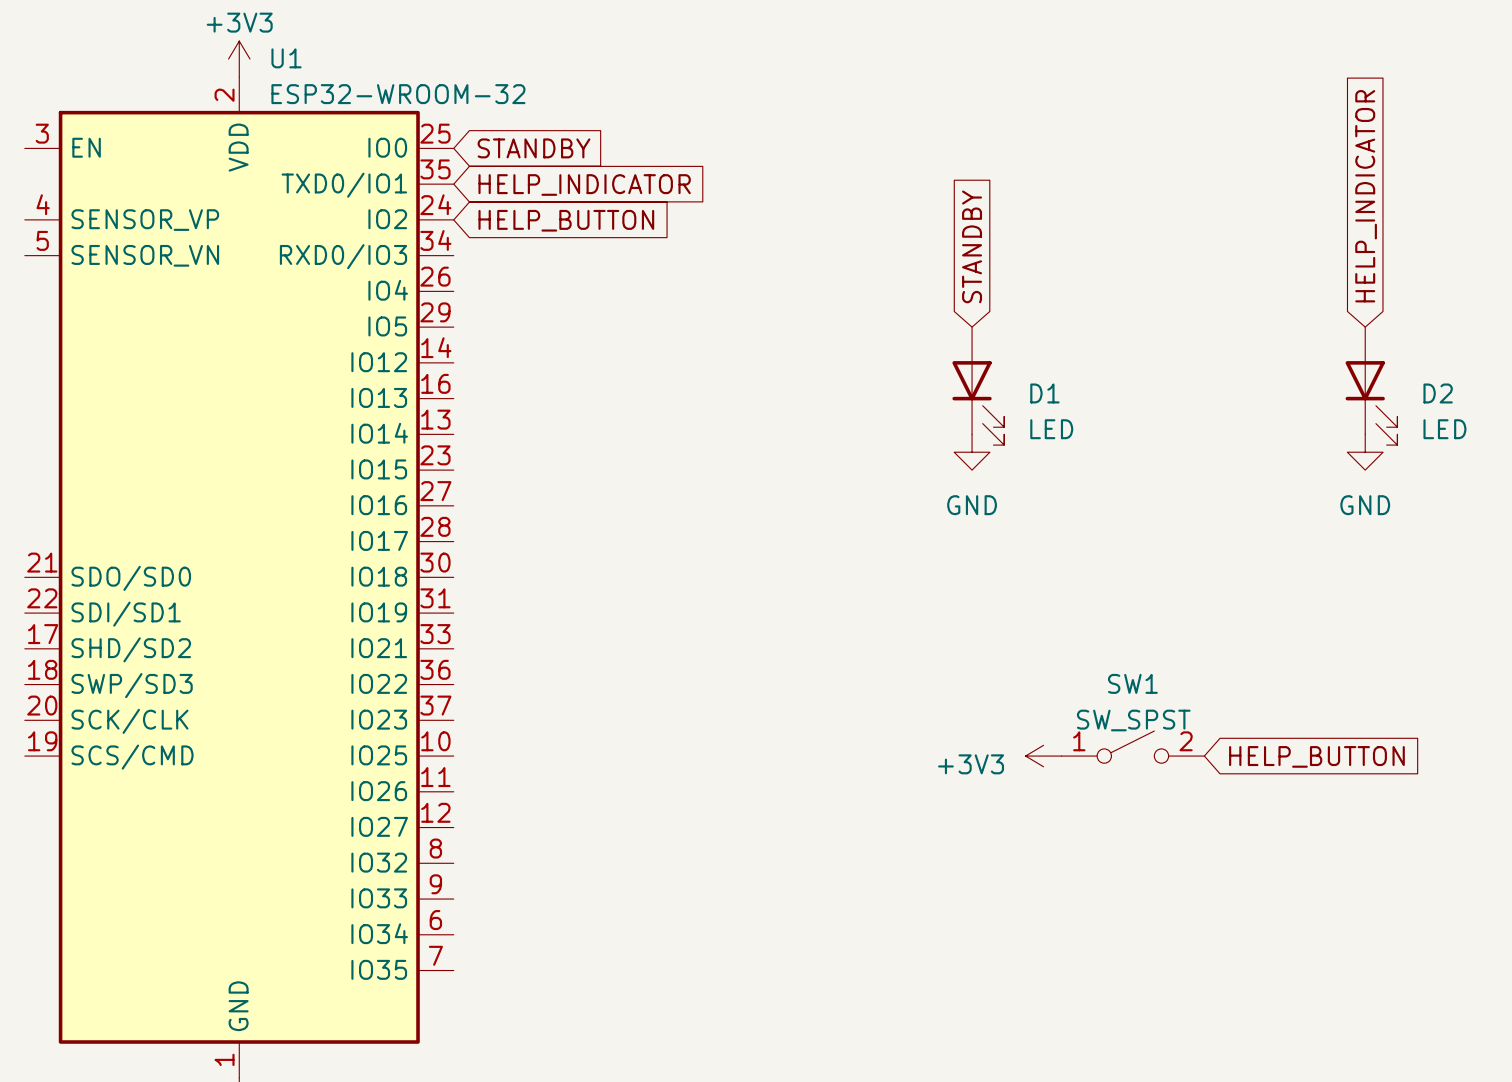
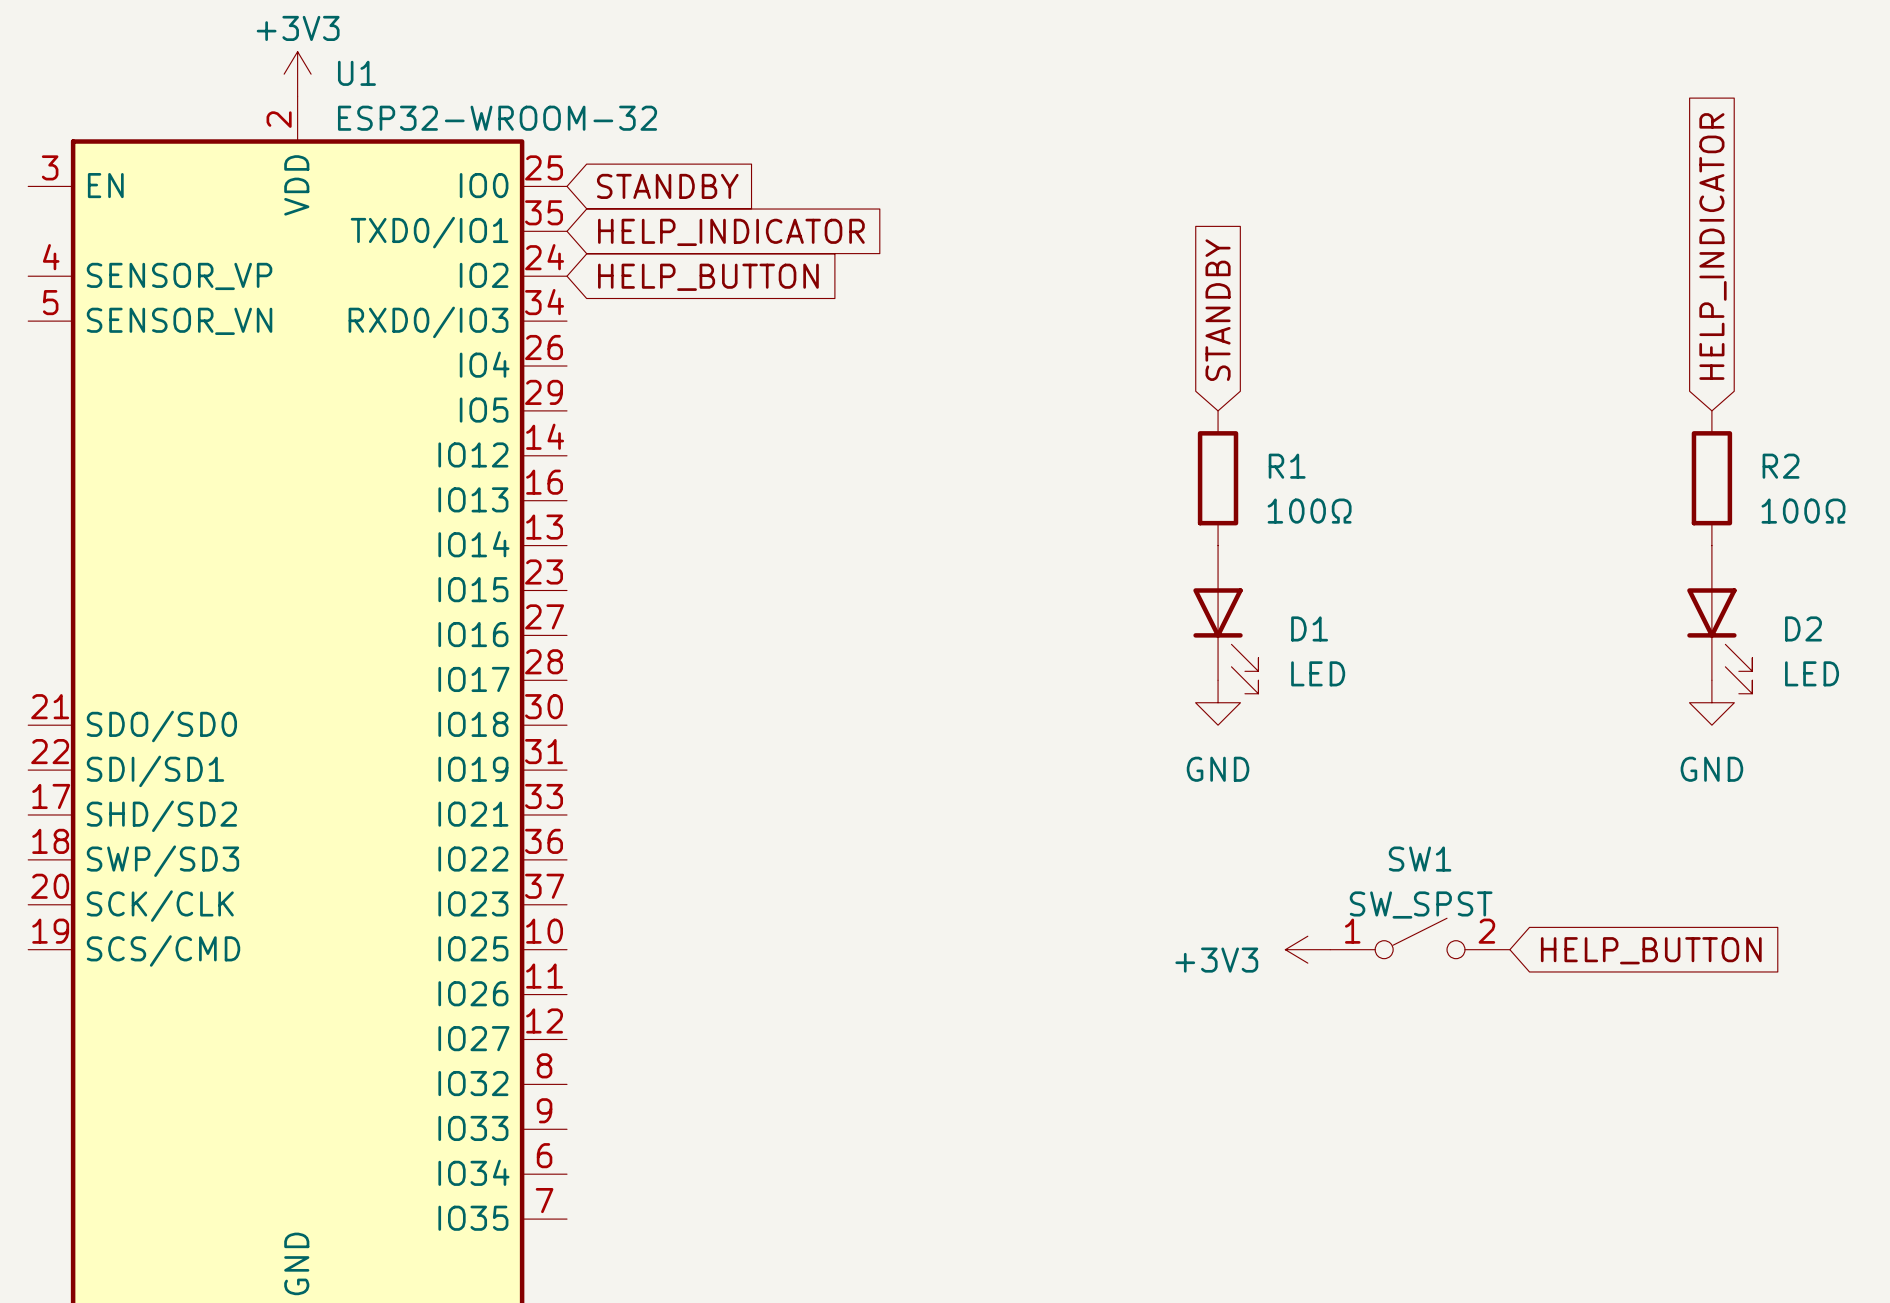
R1: none -> 100Ω (1218, 478)
R2: none -> 100Ω (1711, 478)
D1 position: (978, 386) -> (1225, 619)
D2 position: (1371, 386) -> (1719, 619)
power symbol position: GND (972, 452) -> GND (1218, 702)
power symbol position: GND (1365, 452) -> GND (1711, 702)

